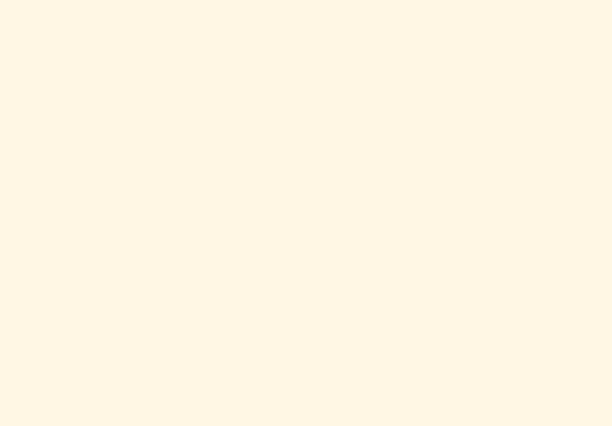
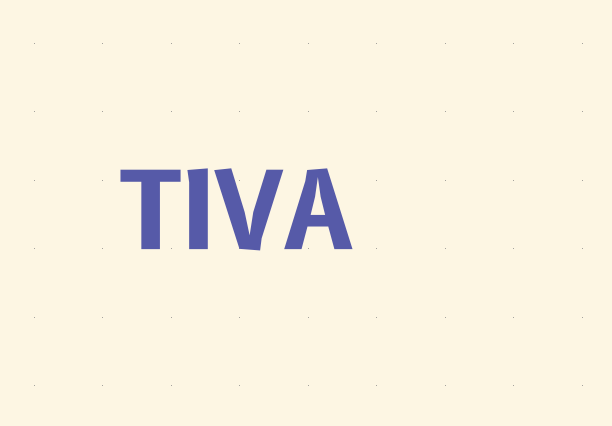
text: none -> TIVA (236, 209)

